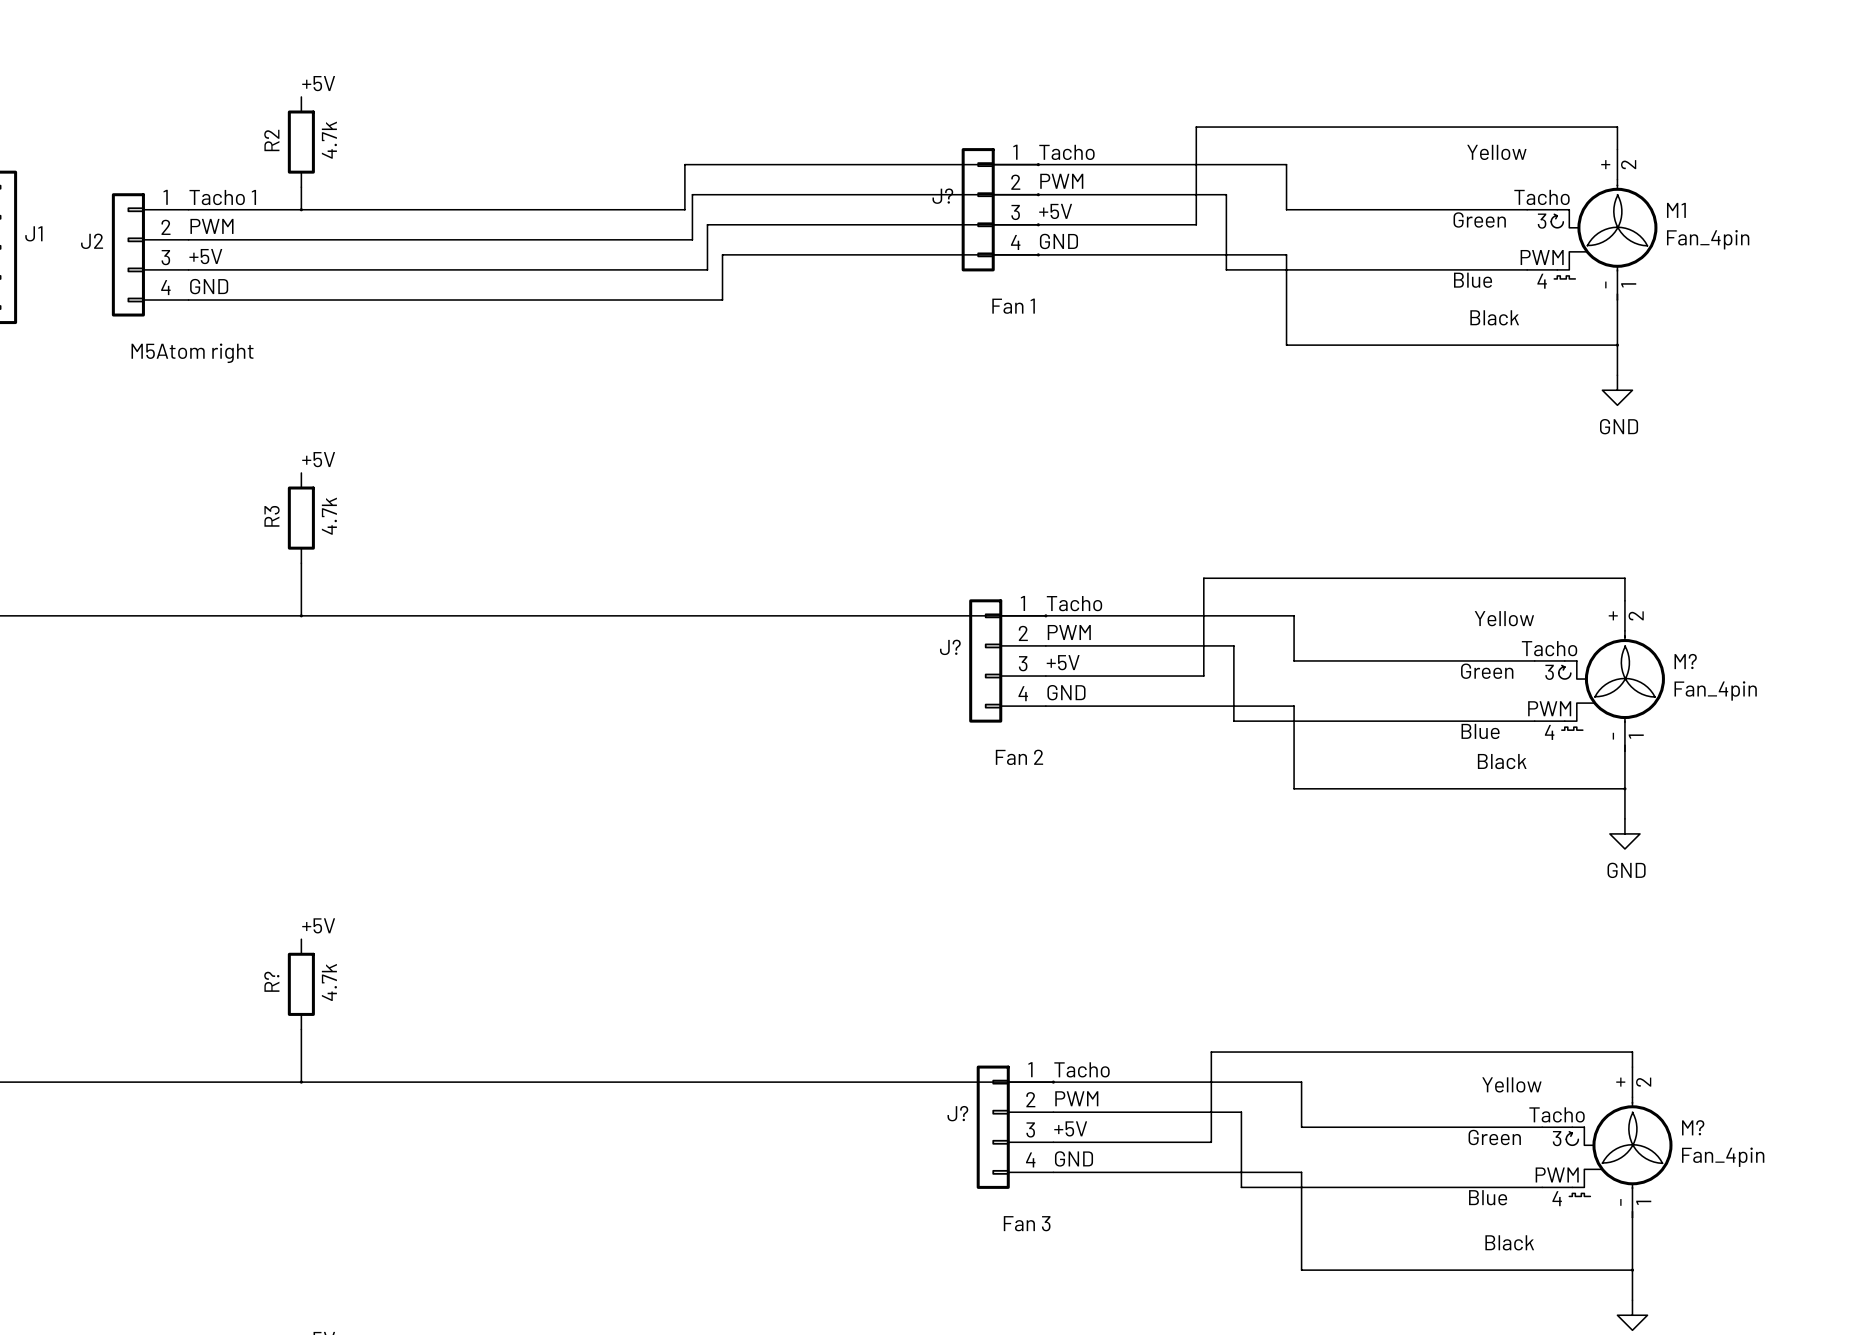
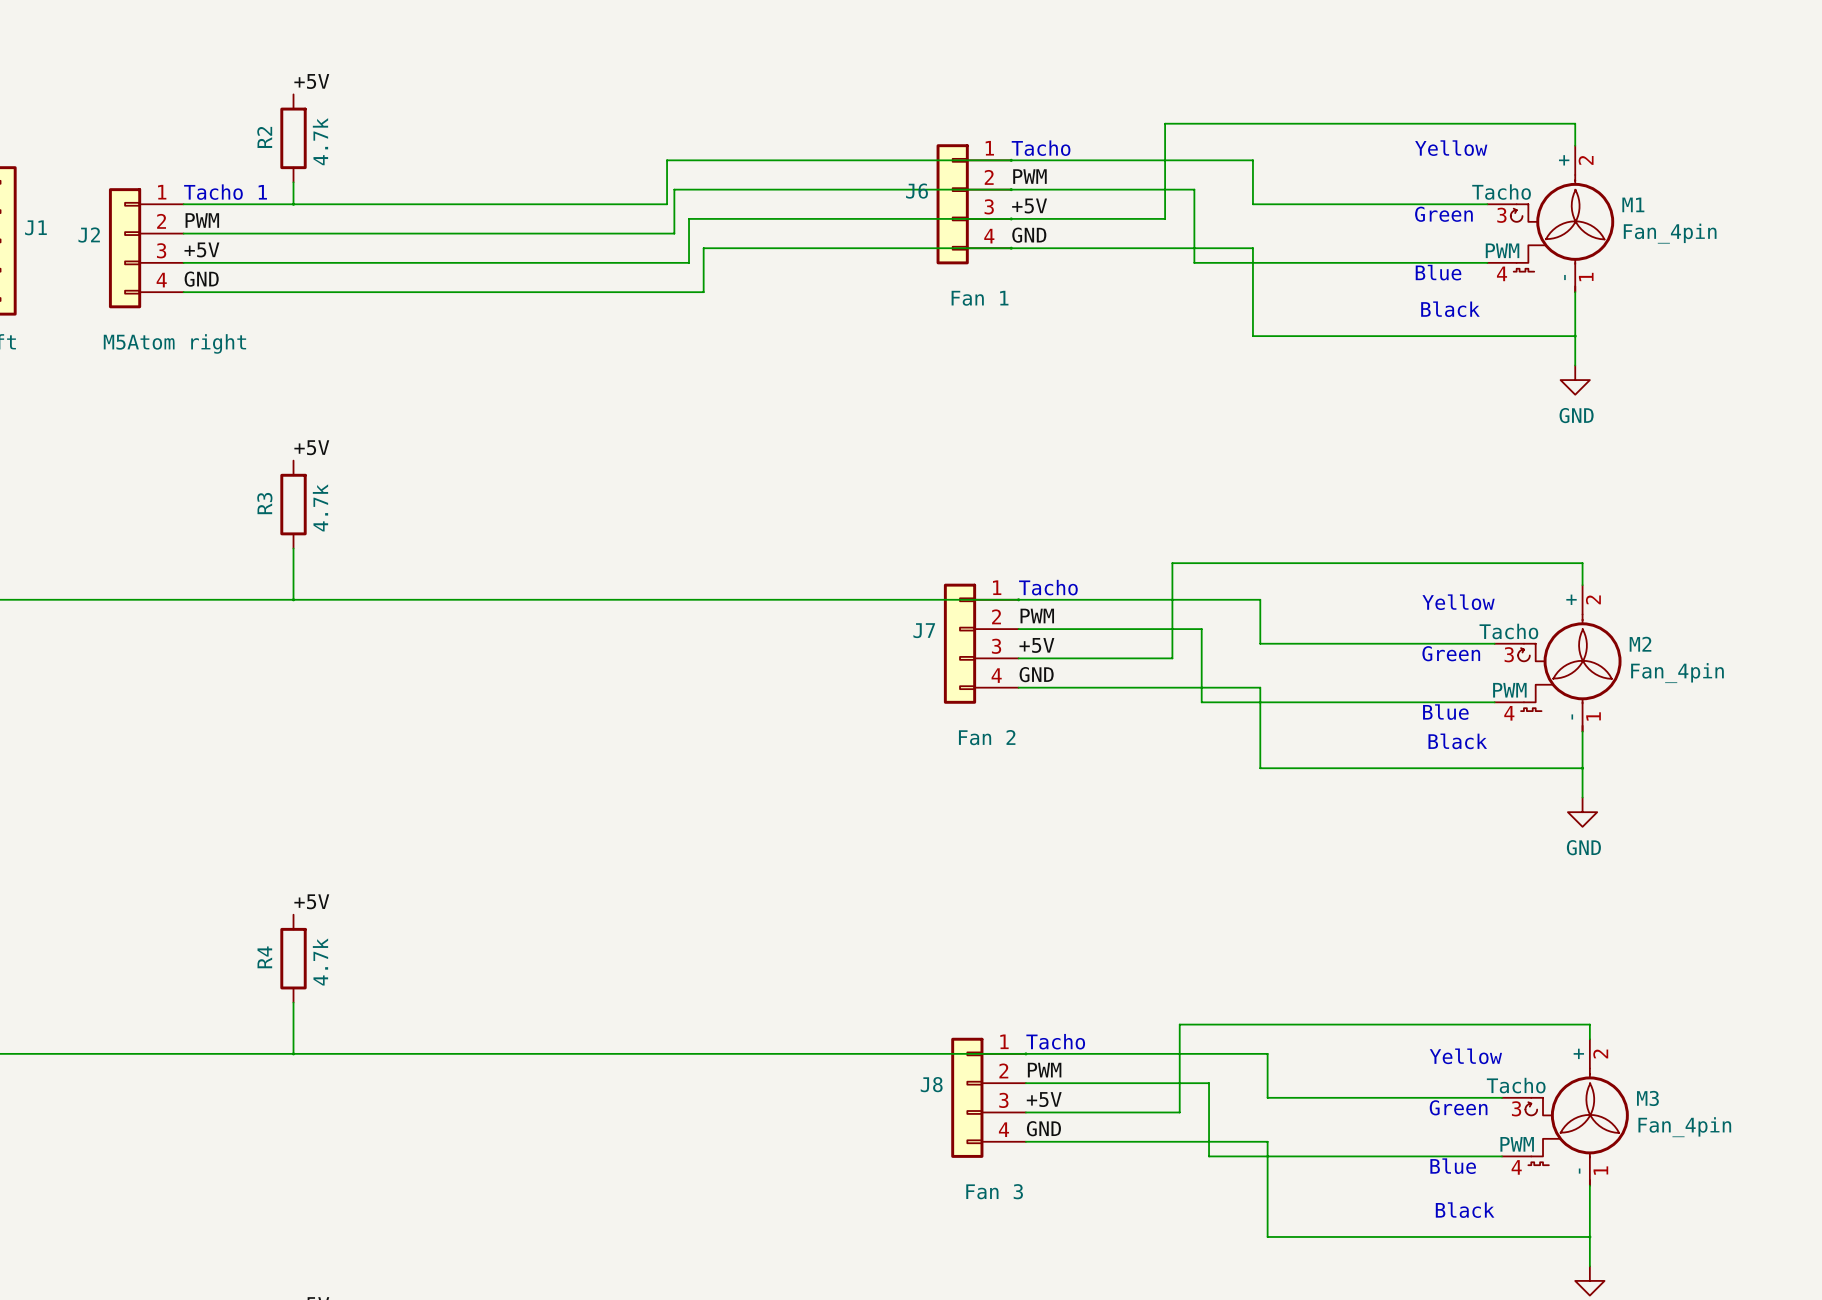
J? name: J? (942, 196) -> J6 (917, 191)
J? name: J? (950, 647) -> J7 (924, 630)
M? name: M? (1685, 661) -> M2 (1640, 644)
R? name: R? (271, 981) -> R4 (264, 957)
J? name: J? (957, 1113) -> J8 (931, 1084)
M? name: M? (1693, 1127) -> M3 (1647, 1098)

